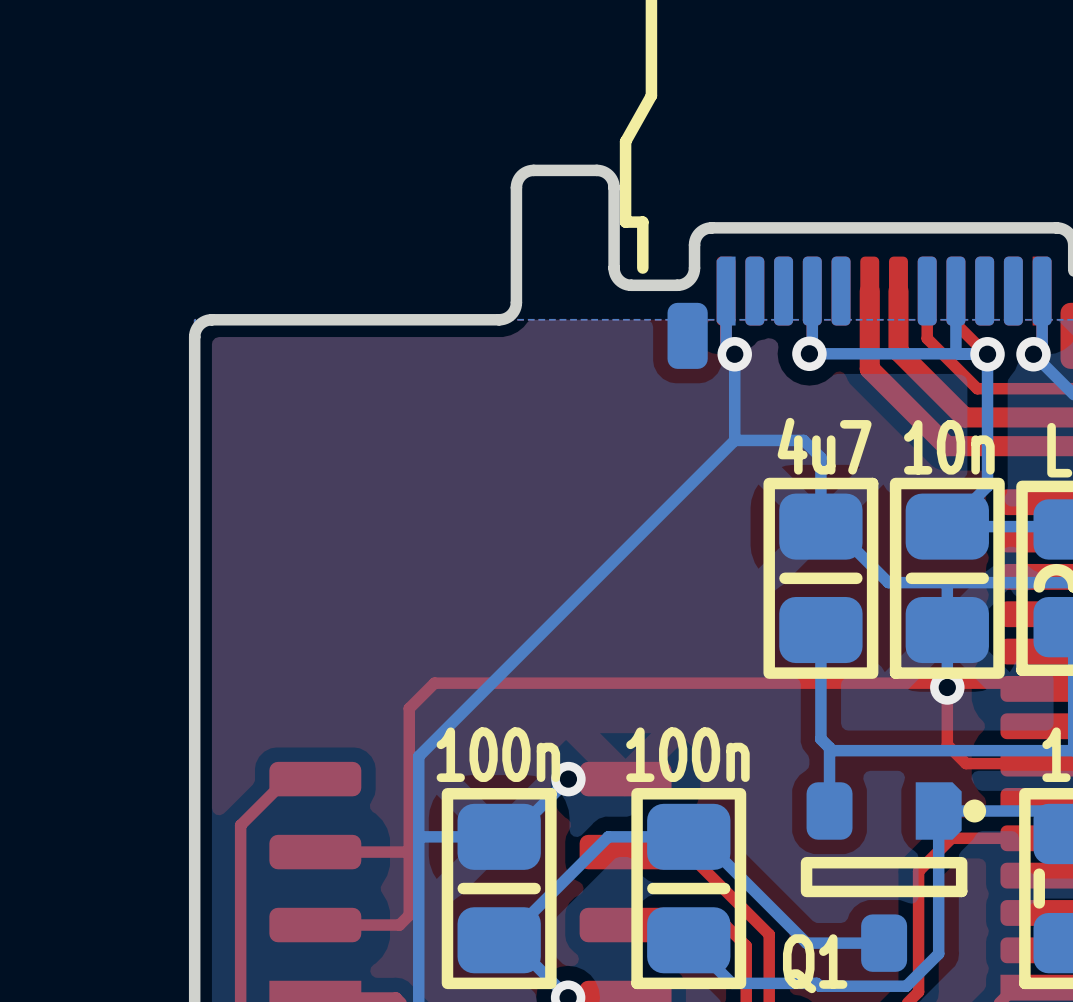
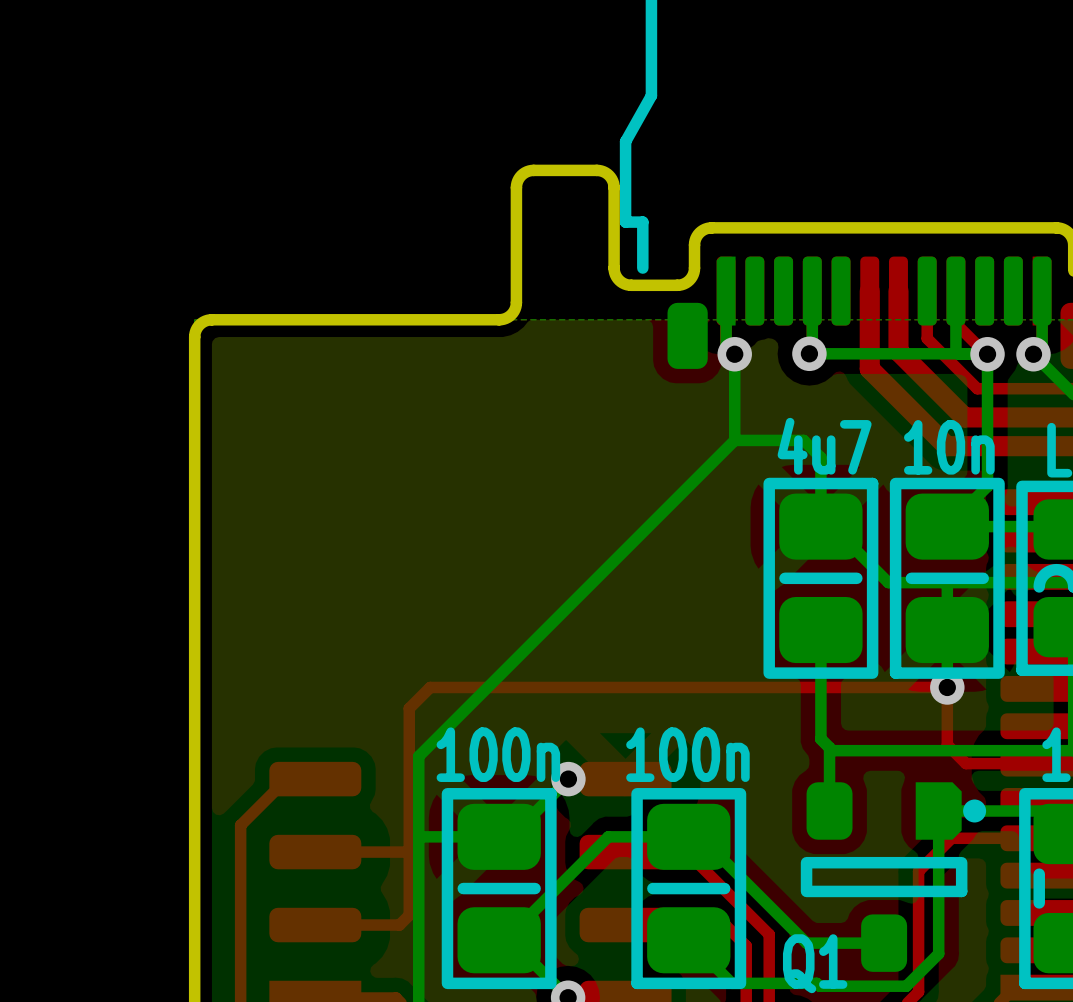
top track: (1050, 683) (434, 683) (430, 687) -> (947, 687) (430, 687)

